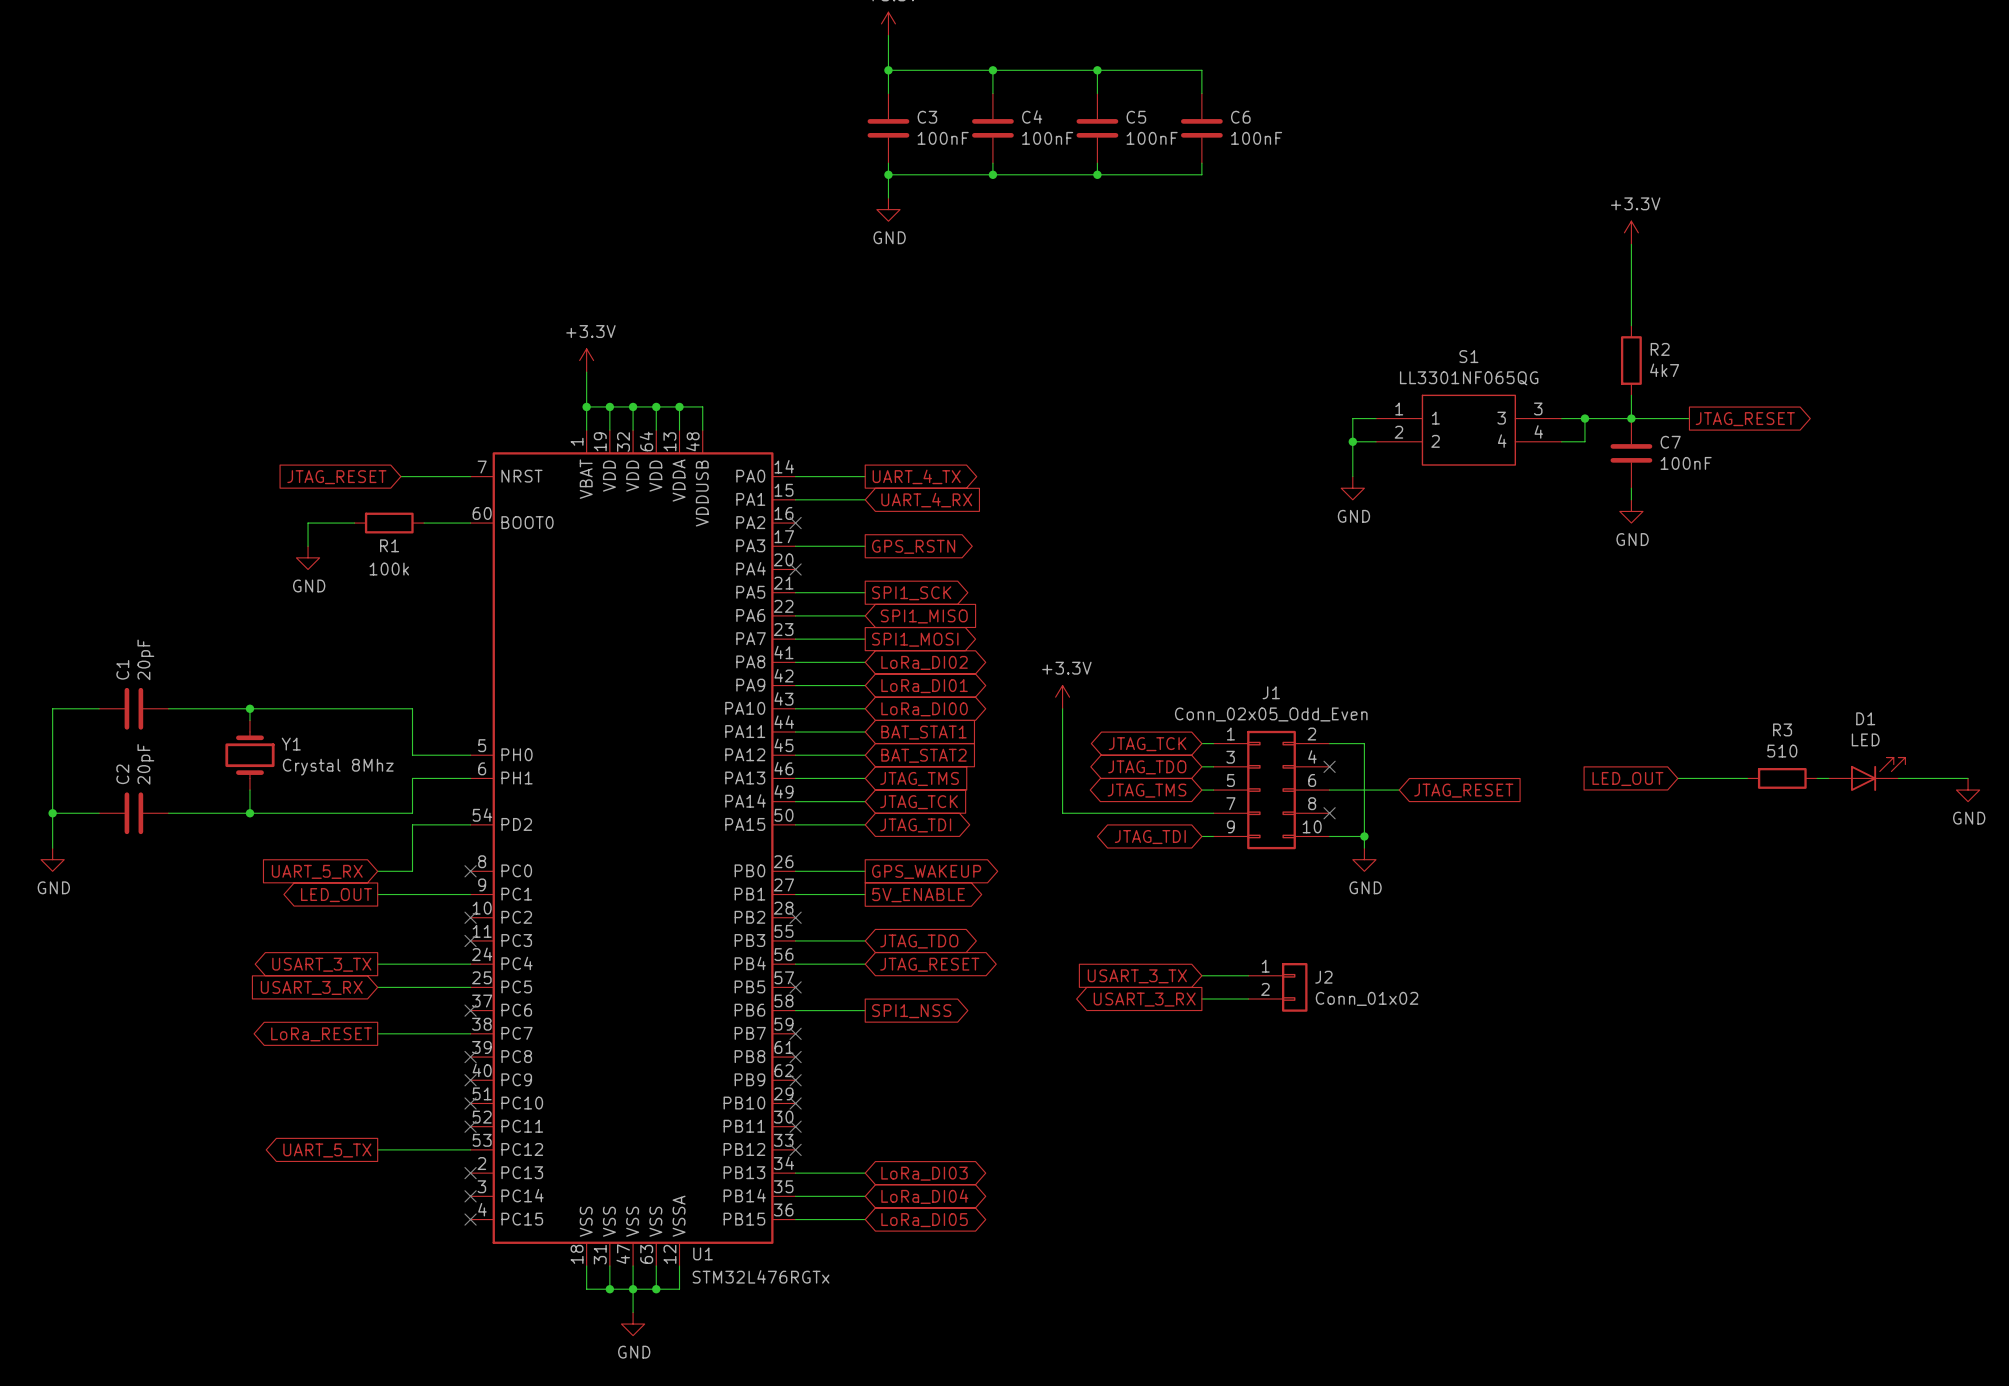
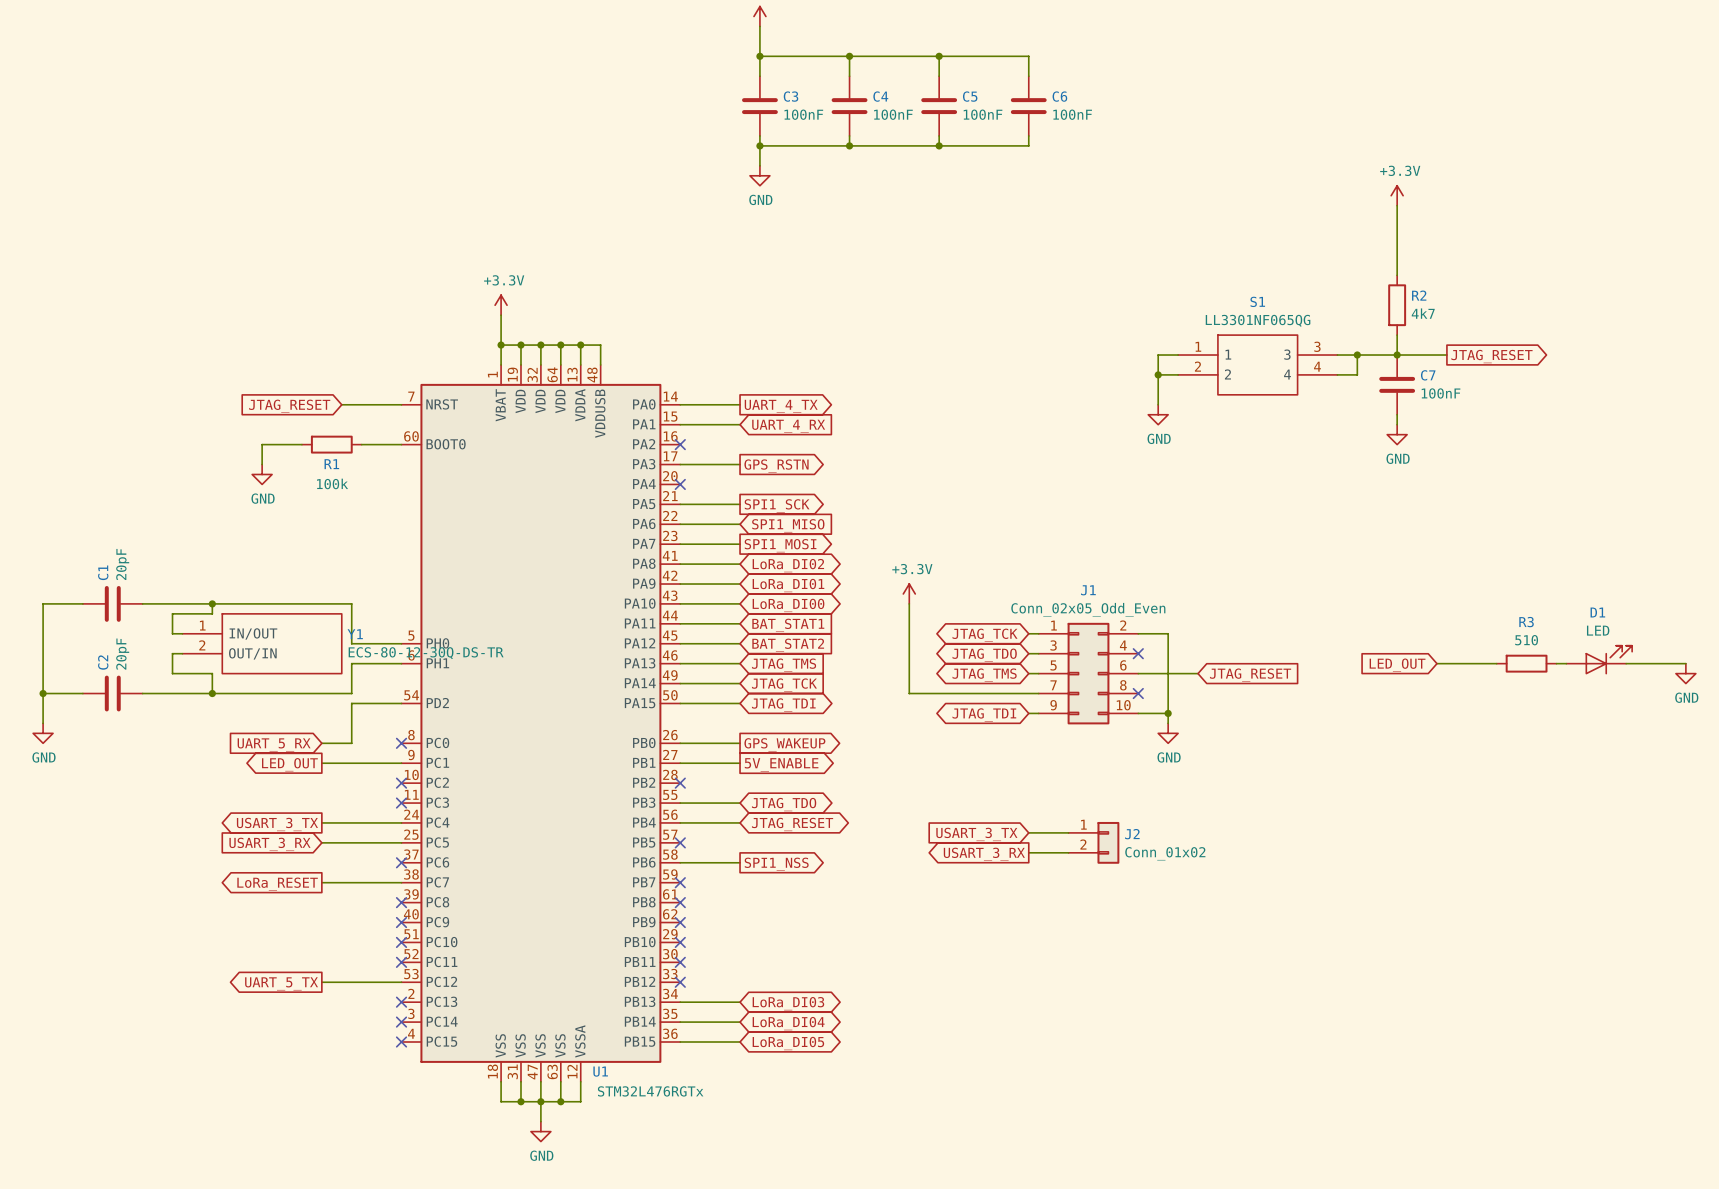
Y1 symbol: [225, 720, 275, 791] -> [182, 613, 343, 675]
wire: none -> (212, 613) (172, 613) (172, 633) (182, 633)
Y1 name position: Y1 (291, 744) -> Y1 (355, 634)
wire: none -> (182, 653) (172, 653) (172, 673) (212, 673)
Y1 value: Crystal 8Mhz (338, 767) -> ECS-80-12-30Q-DS-TR (426, 653)

